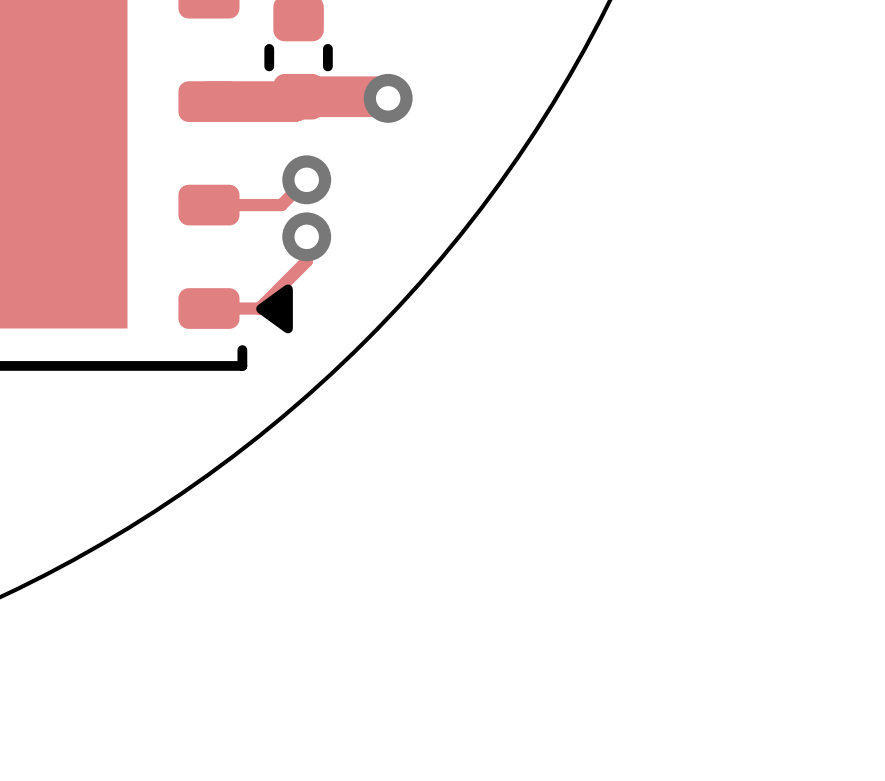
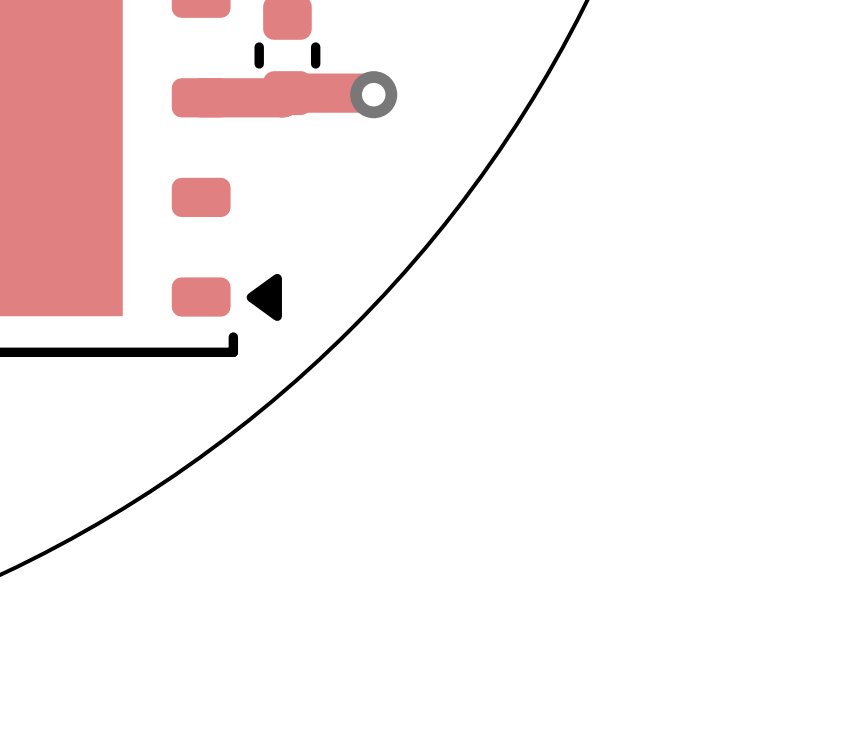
track: (306, 179) (281, 205) (208, 205) -> none
via: (306, 179) -> none
track: (306, 236) (306, 261) (259, 308) (208, 308) -> none
via: (306, 236) -> none

